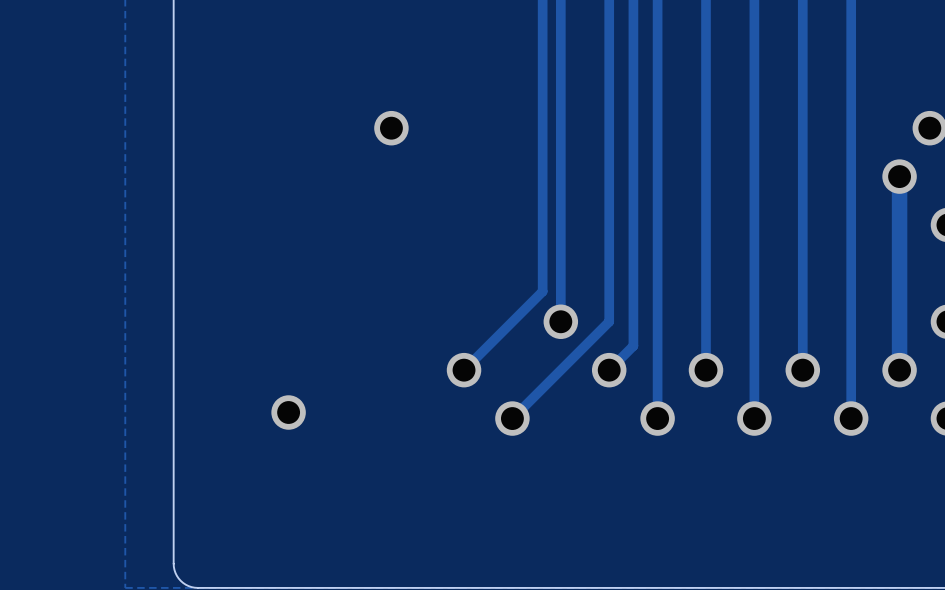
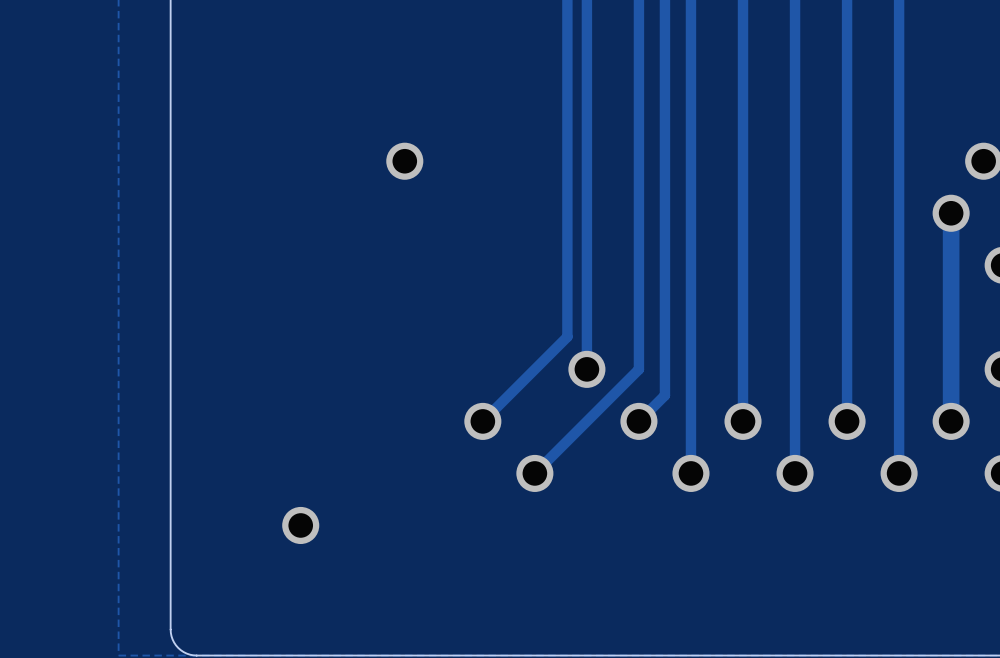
via position: (288, 412) -> (300, 525)

